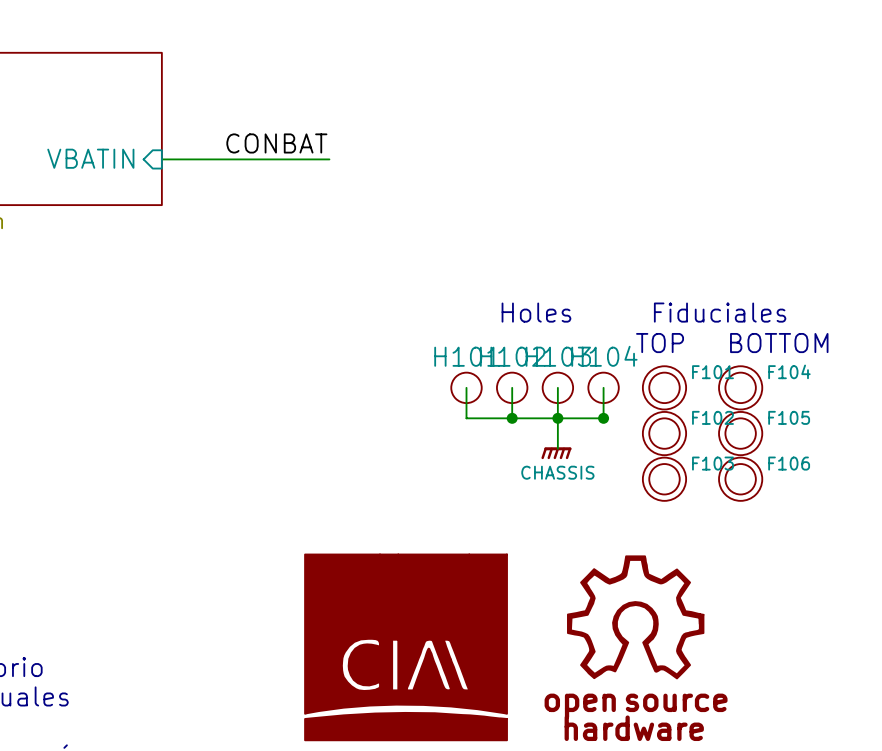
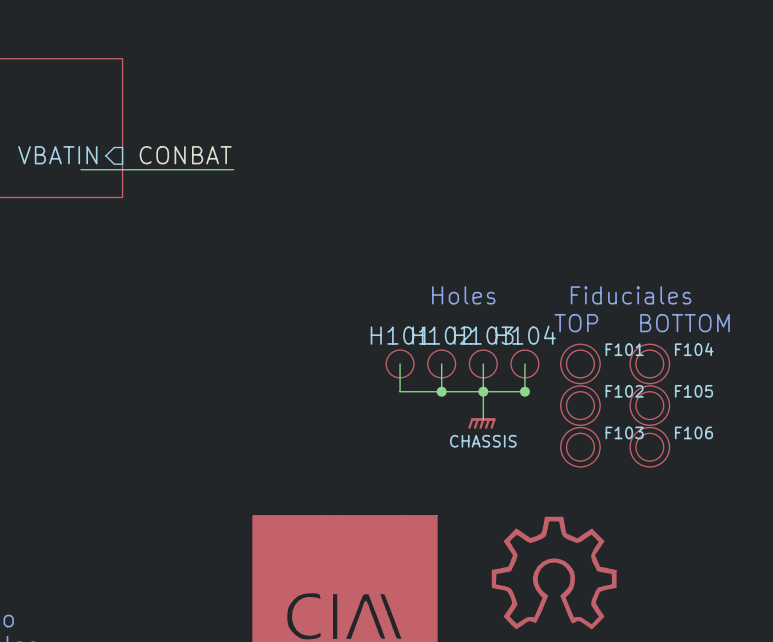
label position: CONBAT (276, 143) -> CONBAT (185, 155)
wire: (161, 159) (329, 159) -> (80, 169) (233, 169)

